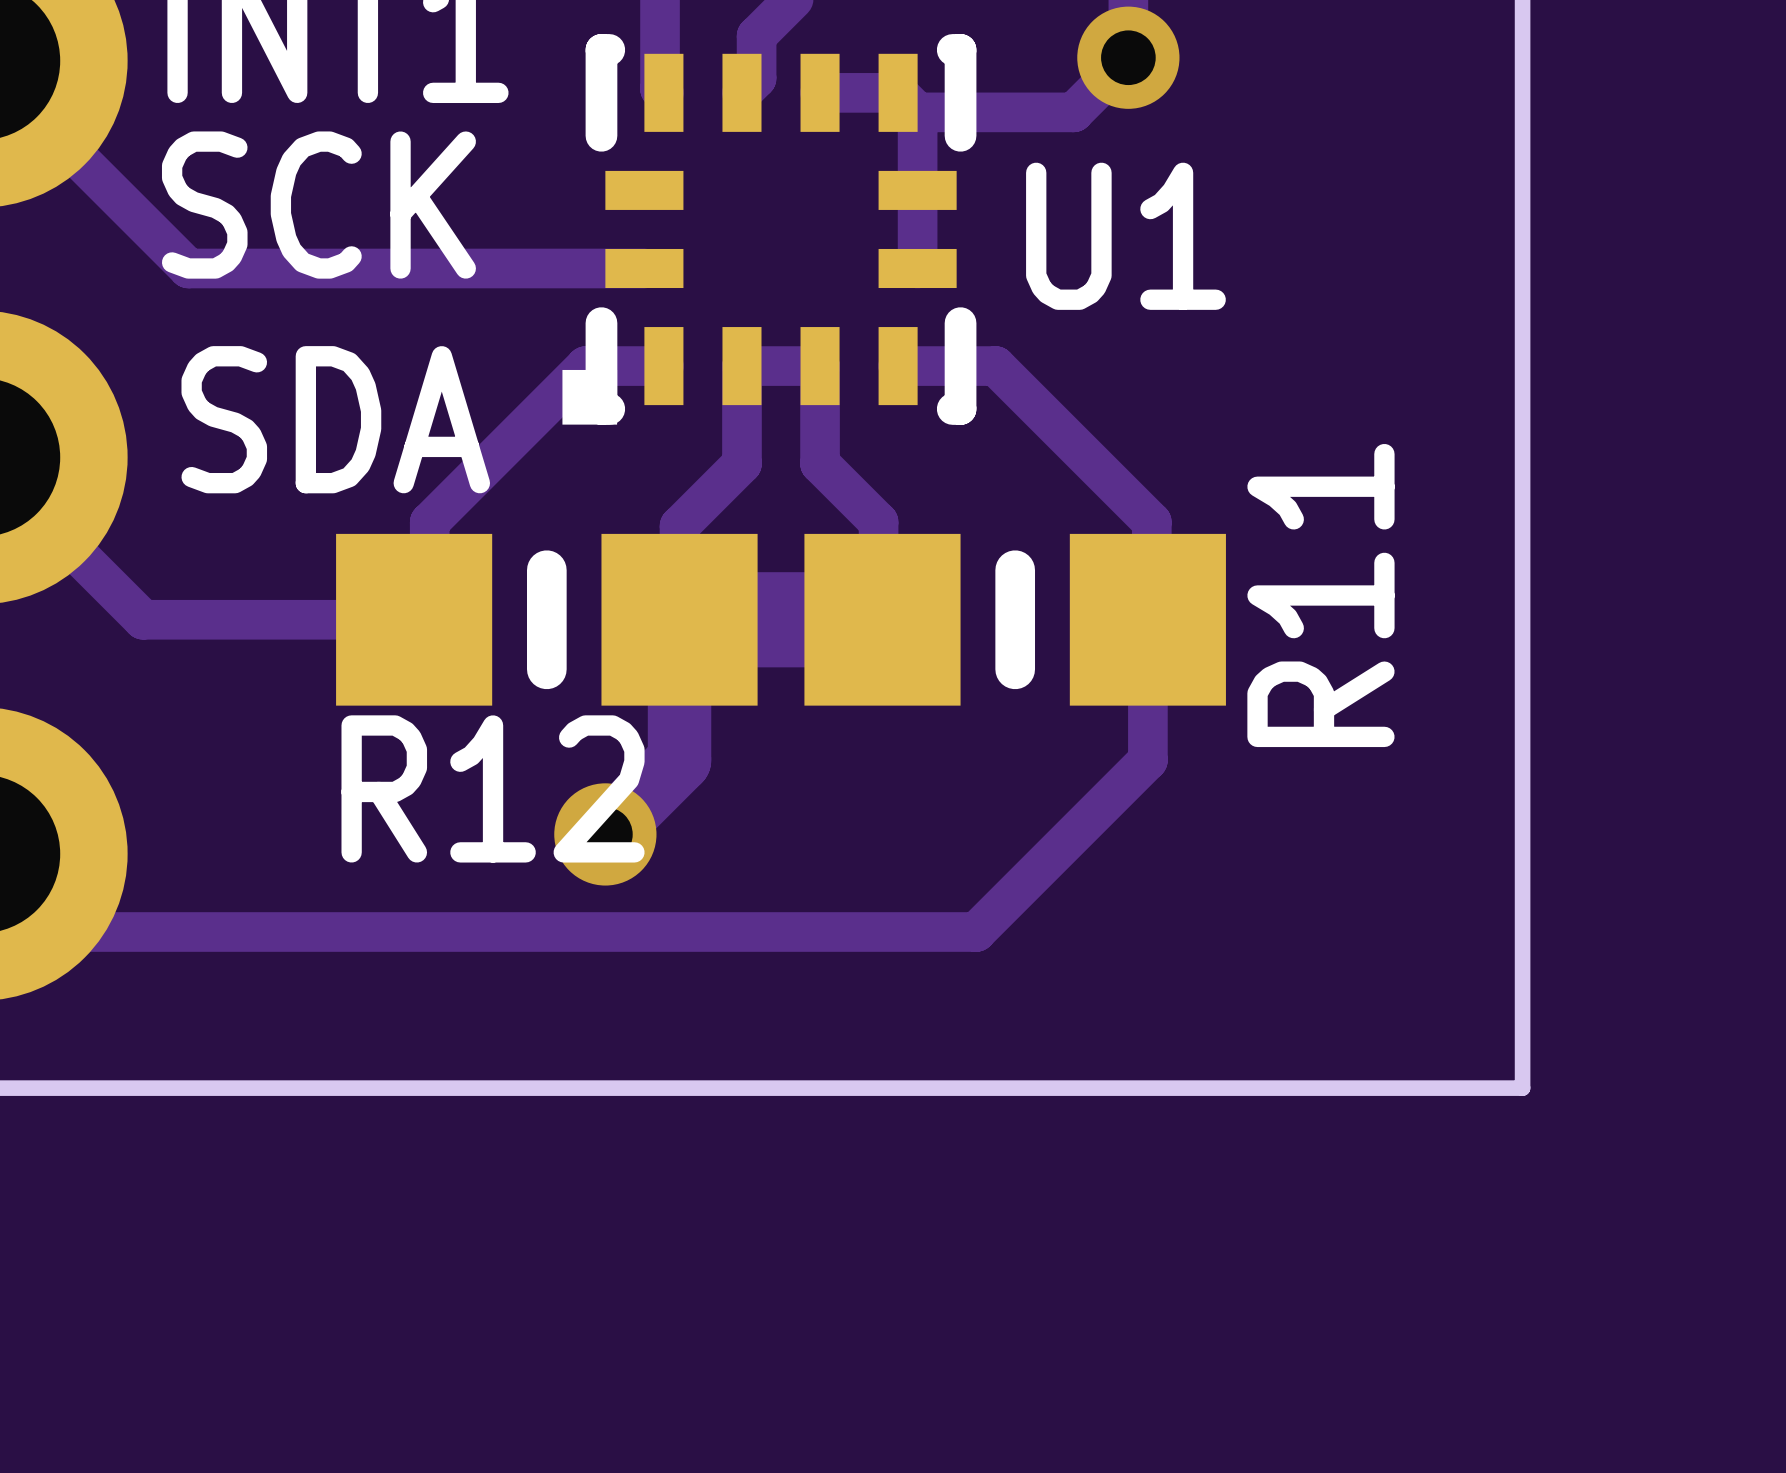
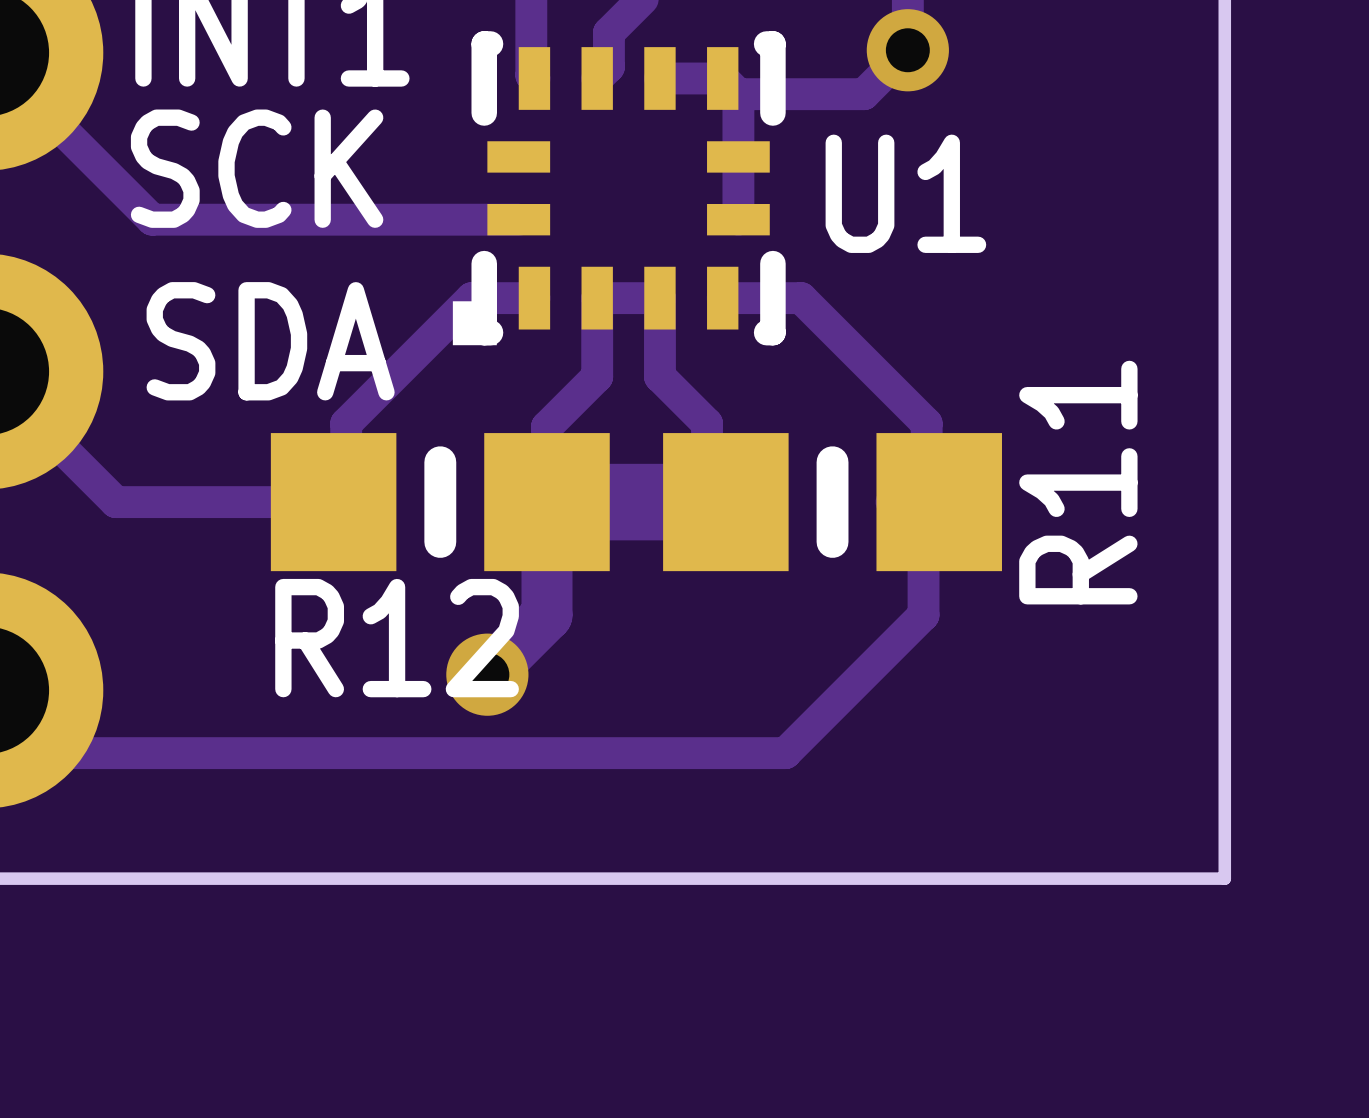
R11 position: (1015, 619) -> (832, 502)

